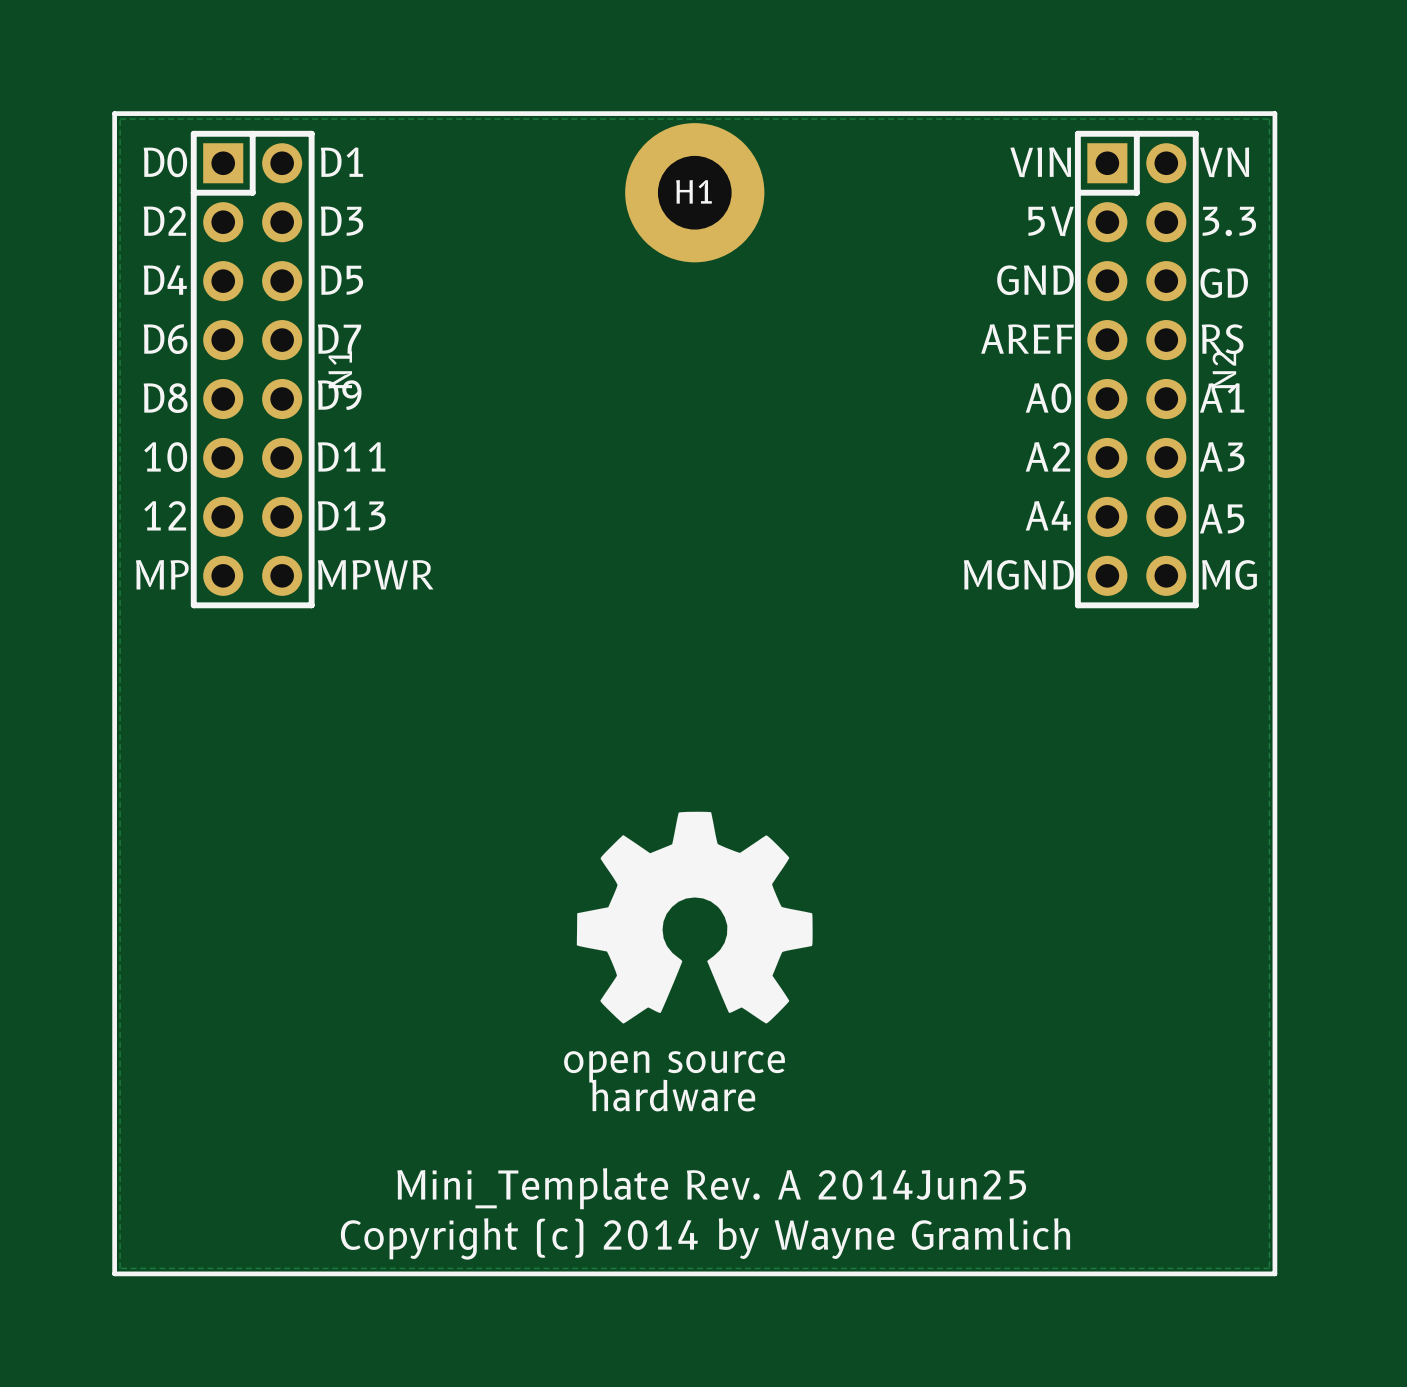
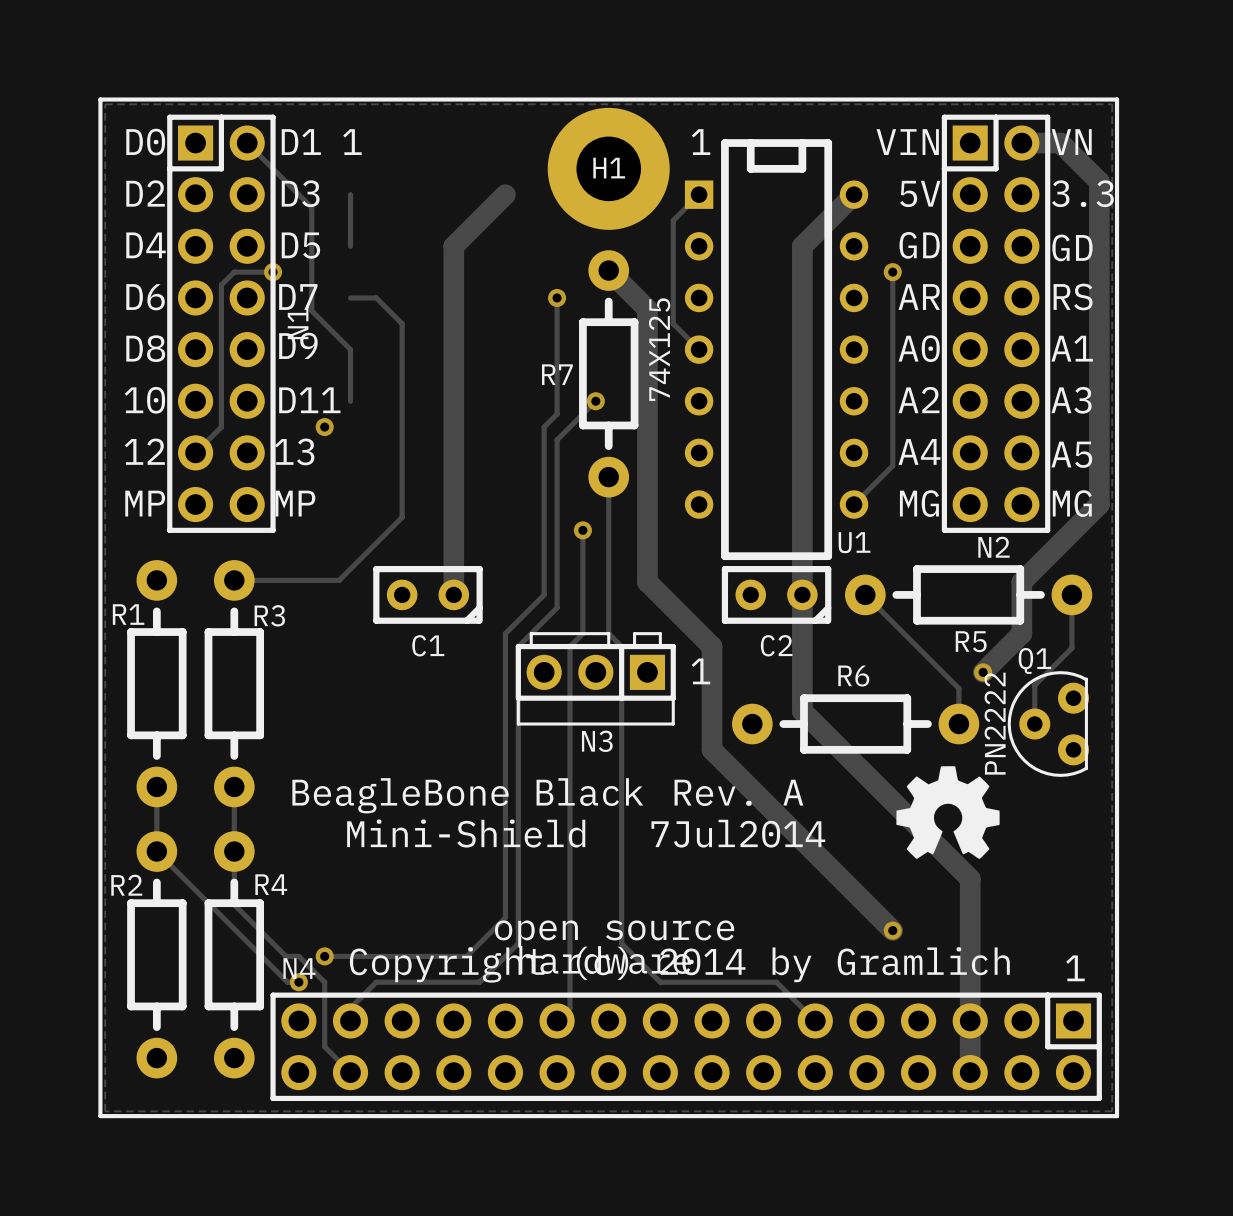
text: none -> 1 (352, 142)
text: none -> 1 (701, 142)
track: none -> (247, 143) (311, 207) (311, 310) (350, 349) (350, 401)
track: none -> (1021, 143) (1060, 143) (1099, 181) (1099, 504) (1021, 582) (1021, 633) (983, 672)
track: none -> (350, 194) (350, 246)
track: none -> (505, 194) (453, 246) (453, 594)
track: none -> (699, 194) (673, 220) (673, 323) (699, 349)
track: none -> (854, 194) (802, 246) (802, 711) (970, 878) (970, 1072)
text: GND (1035, 280) -> GD (919, 245)
track: none -> (608, 270) (647, 309) (647, 582) (712, 646) (712, 749) (892, 930)
track: none -> (273, 272) (234, 272) (221, 285) (221, 427) (195, 452)
via: none -> (273, 272)
track: none -> (892, 272) (892, 465) (854, 504)
via: none -> (892, 272)
text: AREF (1027, 338) -> AR (919, 297)
track: none -> (350, 297) (376, 297) (402, 323) (402, 517) (339, 580) (234, 580)
track: none -> (557, 297) (557, 414) (544, 427) (544, 594) (505, 633) (505, 917) (466, 956) (324, 956)
via: none -> (557, 297)
N2 name rotation: 0° (1224, 370) -> 90° clockwise (993, 547)
N2 name position: N2 (1224, 370) -> N2 (993, 547)
U1: none -> 74X125 (776, 349)
R7: none -> (608, 373)
track: none -> (595, 401) (557, 439) (557, 607) (518, 646) (518, 943) (479, 982) (376, 982) (350, 1008) (350, 1020)
via: none -> (595, 401)
via: none -> (324, 427)
text: D13 (351, 515) -> 13 (294, 451)
track: none -> (623, 477) (608, 477) (608, 633) (621, 646) (621, 943) (660, 982) (776, 982) (815, 1020)
text: MPWR (375, 574) -> MP (295, 503)
text: MGND (1018, 574) -> MG (919, 503)
track: none -> (582, 530) (582, 633) (569, 646) (569, 1008) (557, 1020)
via: none -> (582, 530)
C1: none -> (427, 594)
C2: none -> (776, 594)
track: none -> (865, 594) (958, 688) (958, 724)
R5: none -> (968, 594)
track: none -> (1071, 594) (1071, 648) (1034, 685) (1034, 724)
text: none -> 1 (701, 671)
via: none -> (983, 672)
N3: none -> (595, 678)
R1: none -> (156, 683)
R3: none -> (234, 683)
drawing: [576, 811, 813, 1024] -> none
R6: none -> (855, 724)
Q1: none -> PN2222 (1048, 724)
drawing: none -> [896, 766, 1000, 859]
track: none -> (156, 786) (156, 851) (287, 982) (298, 982)
track: none -> (234, 786) (234, 904) (285, 956) (298, 956) (324, 982) (324, 1046) (350, 1072)
text: none -> Rev. A (738, 792)
text: none -> BeagleBone Black (467, 795)
text: none -> Mini-Shield (466, 833)
text: none -> 7Jul2014 (738, 833)
via: none -> (892, 930)
R2: none -> (156, 954)
R4: none -> (234, 954)
via: none -> (324, 956)
text: none -> Copyright (c) 2014 by Gramlich (679, 964)
text: none -> 1 (1075, 968)
via: none -> (298, 982)
text: Mini_Template Rev. A 2014Jun25 (711, 1188) -> none
N4: none -> (686, 1046)
text: Copyright (c) 2014 by Wayne Gramlich (705, 1238) -> none

